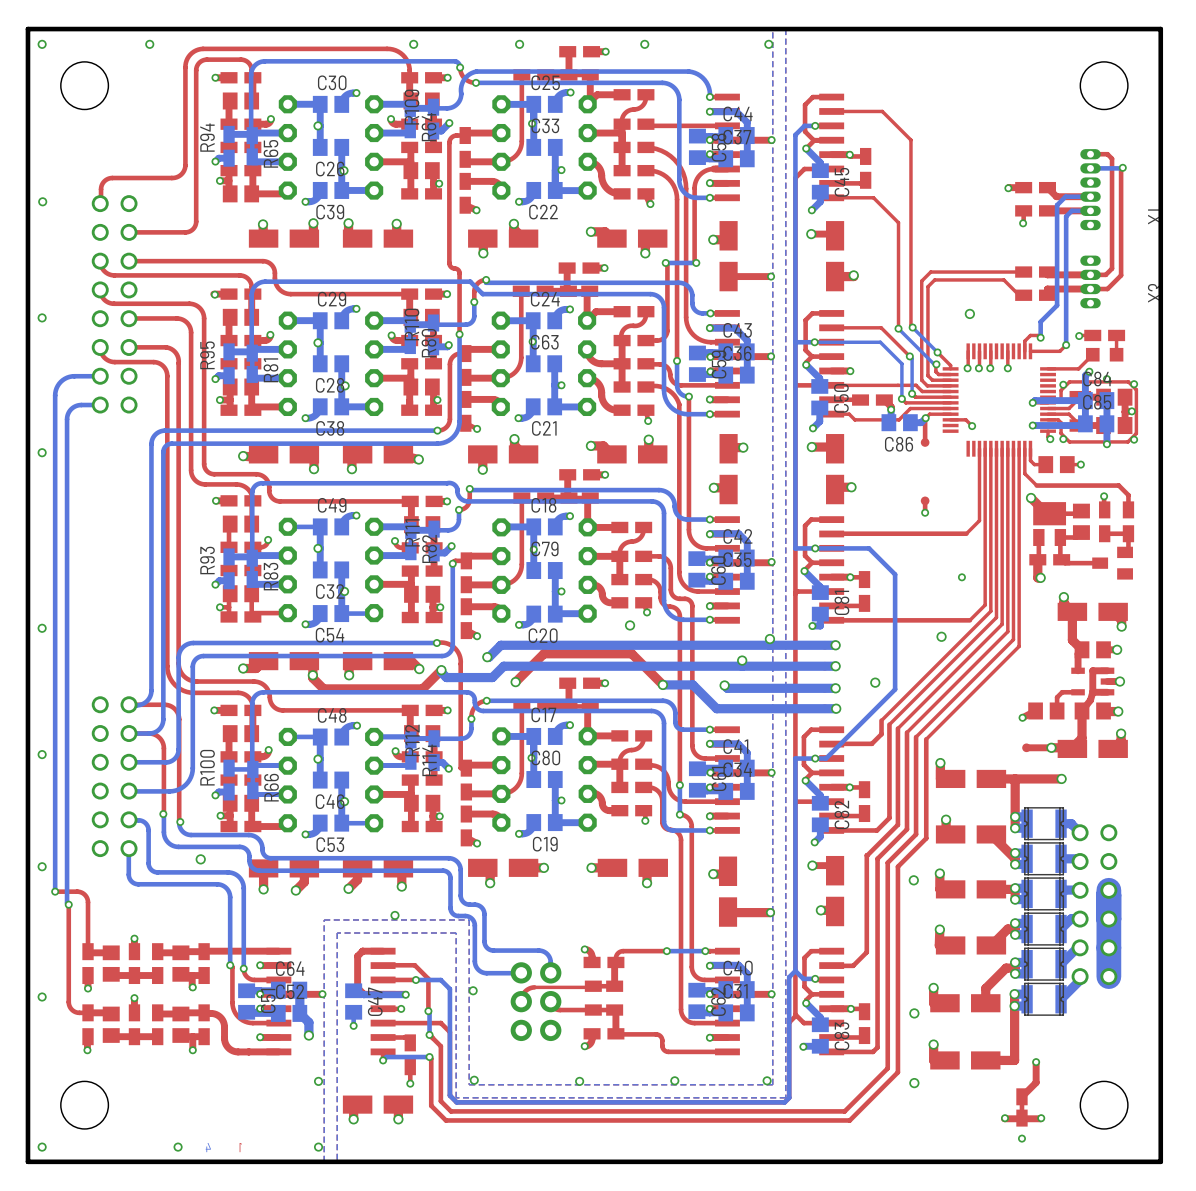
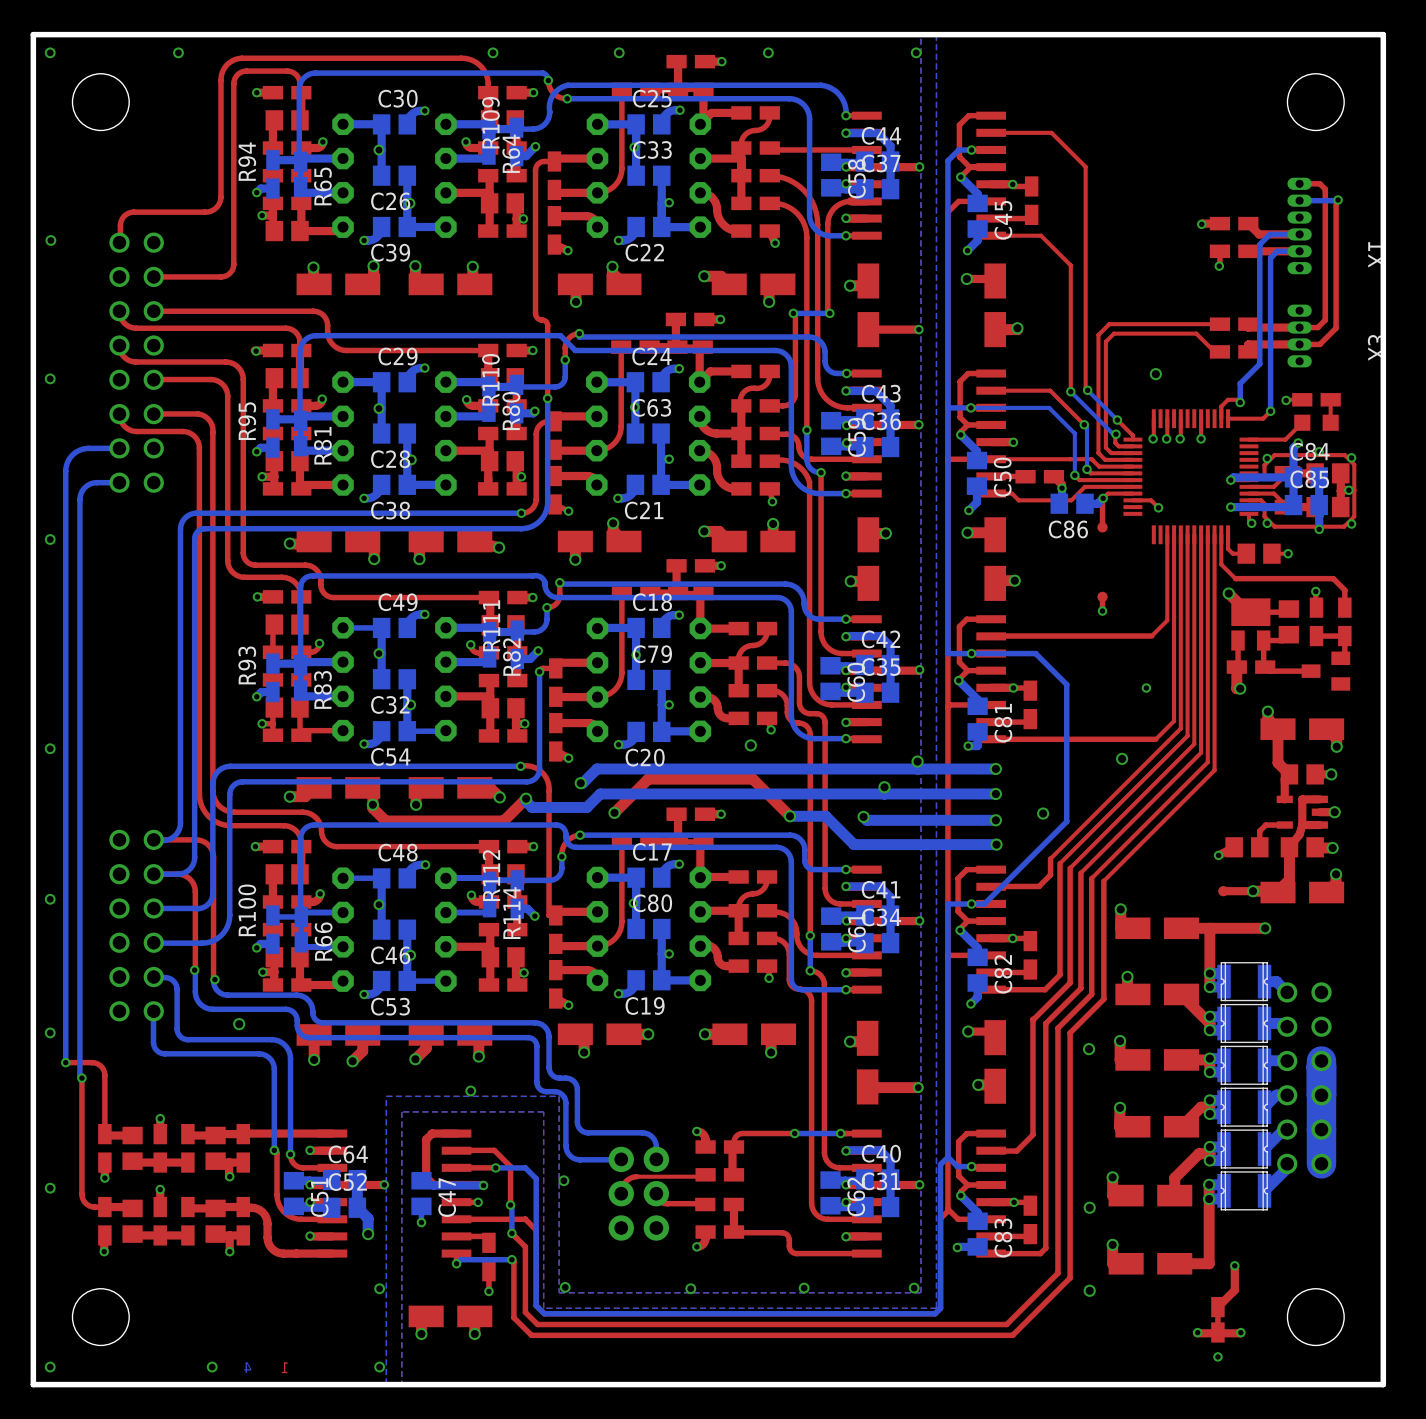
part footprint: [584, 980, 624, 992] -> [695, 1168, 745, 1182]
part footprint: [584, 1004, 624, 1016] -> [695, 1197, 744, 1212]

